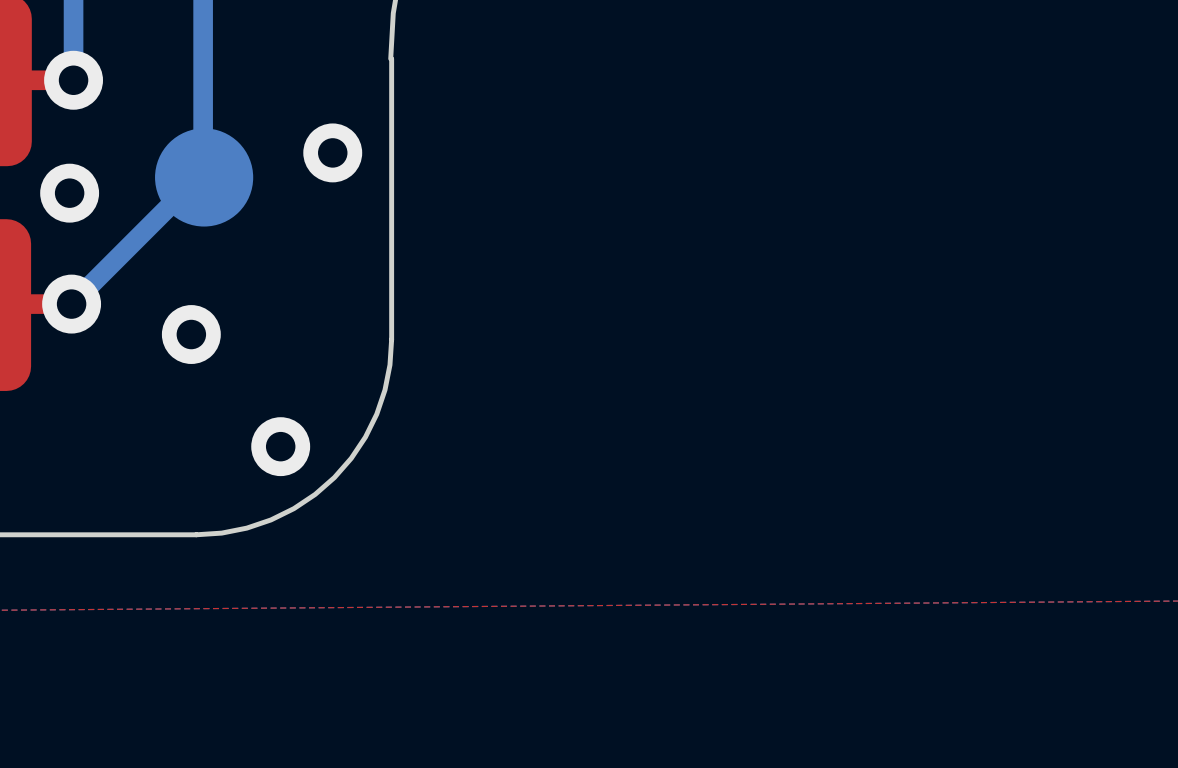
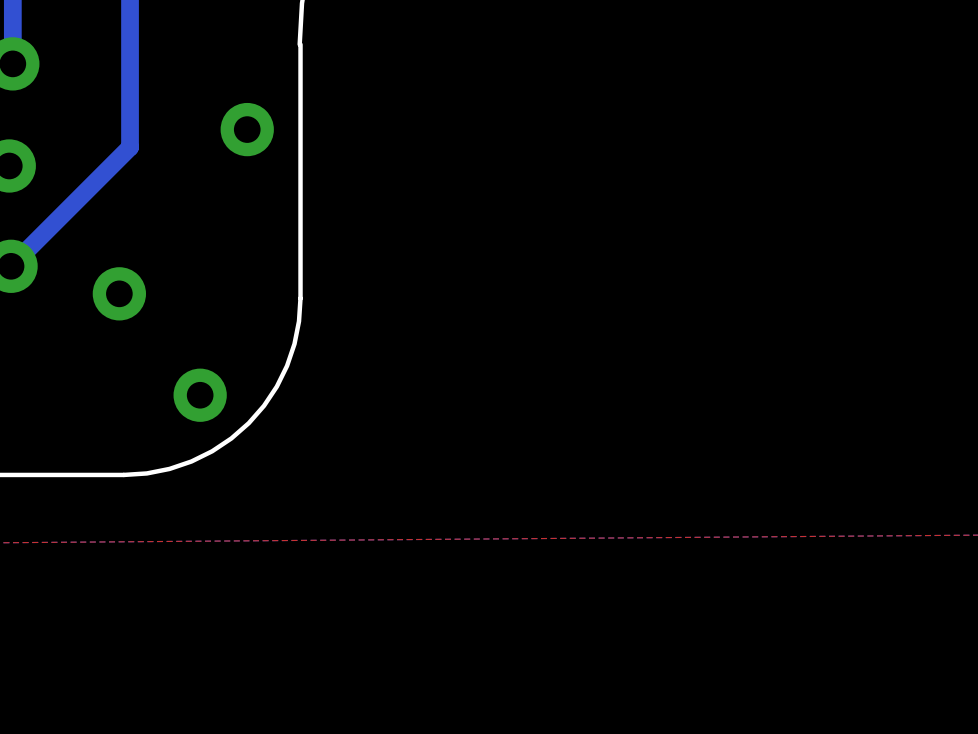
part: (204, 177) -> none

